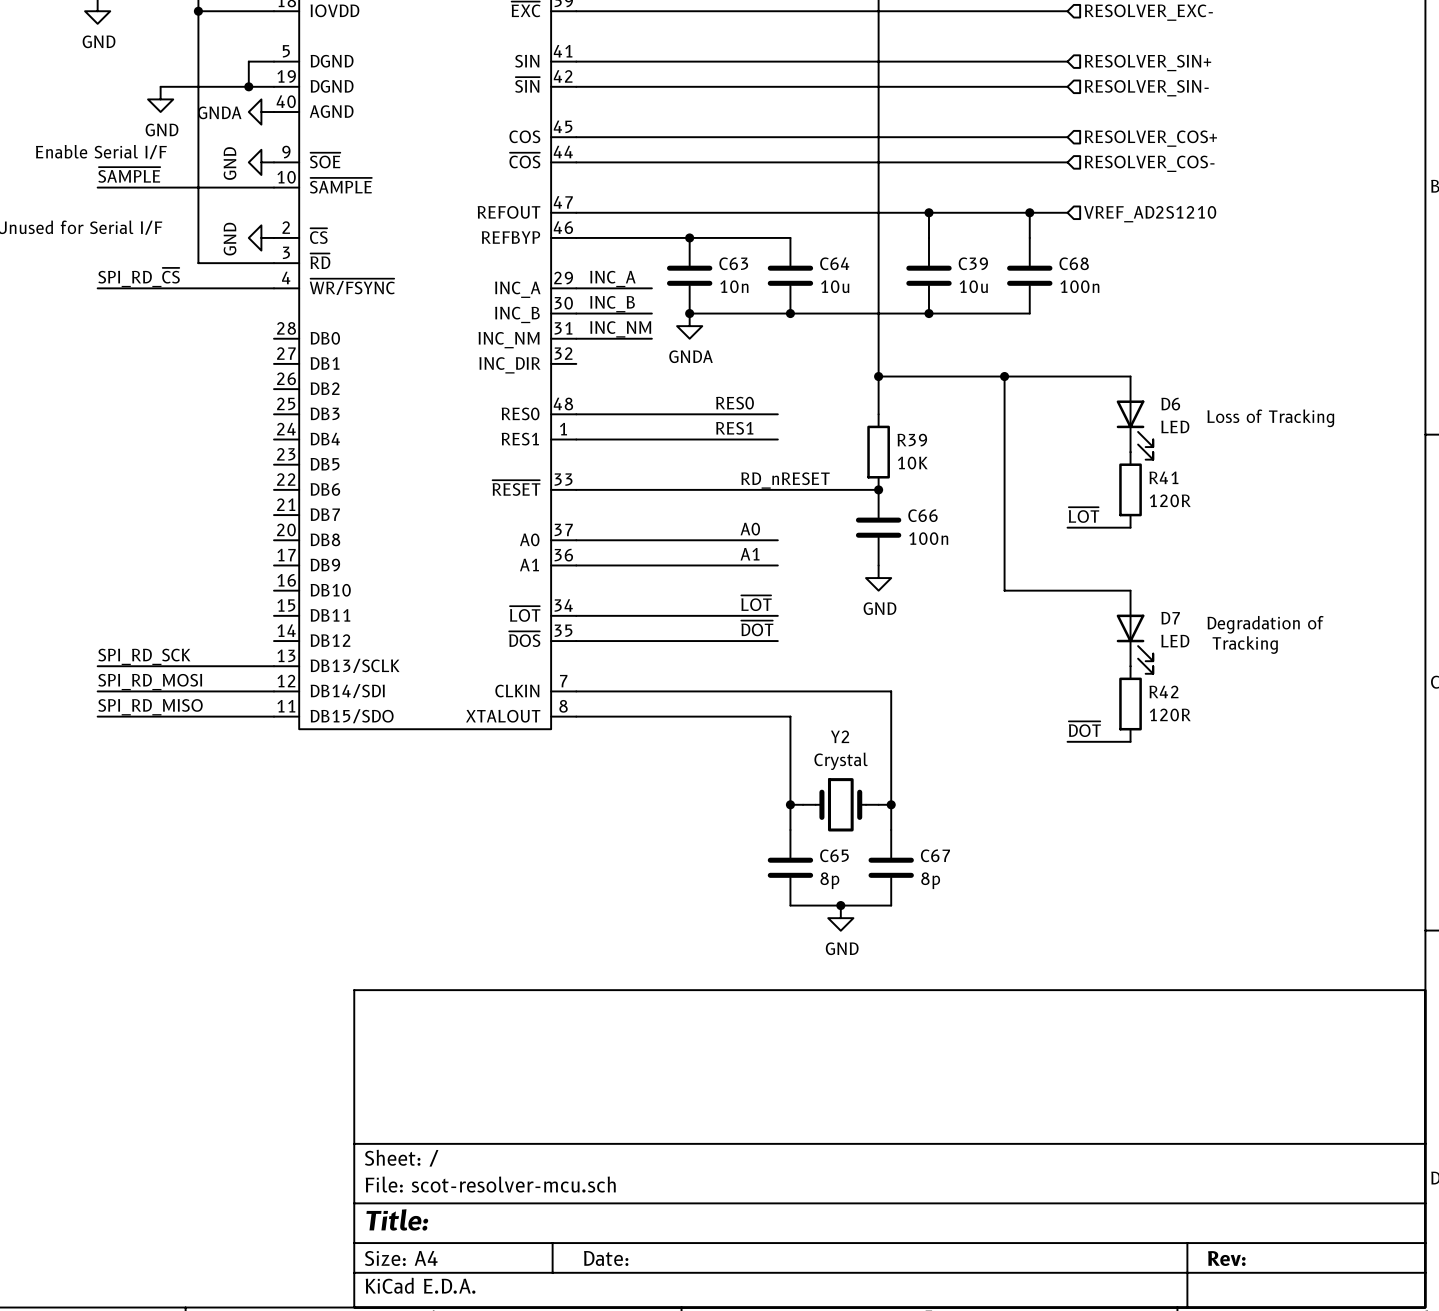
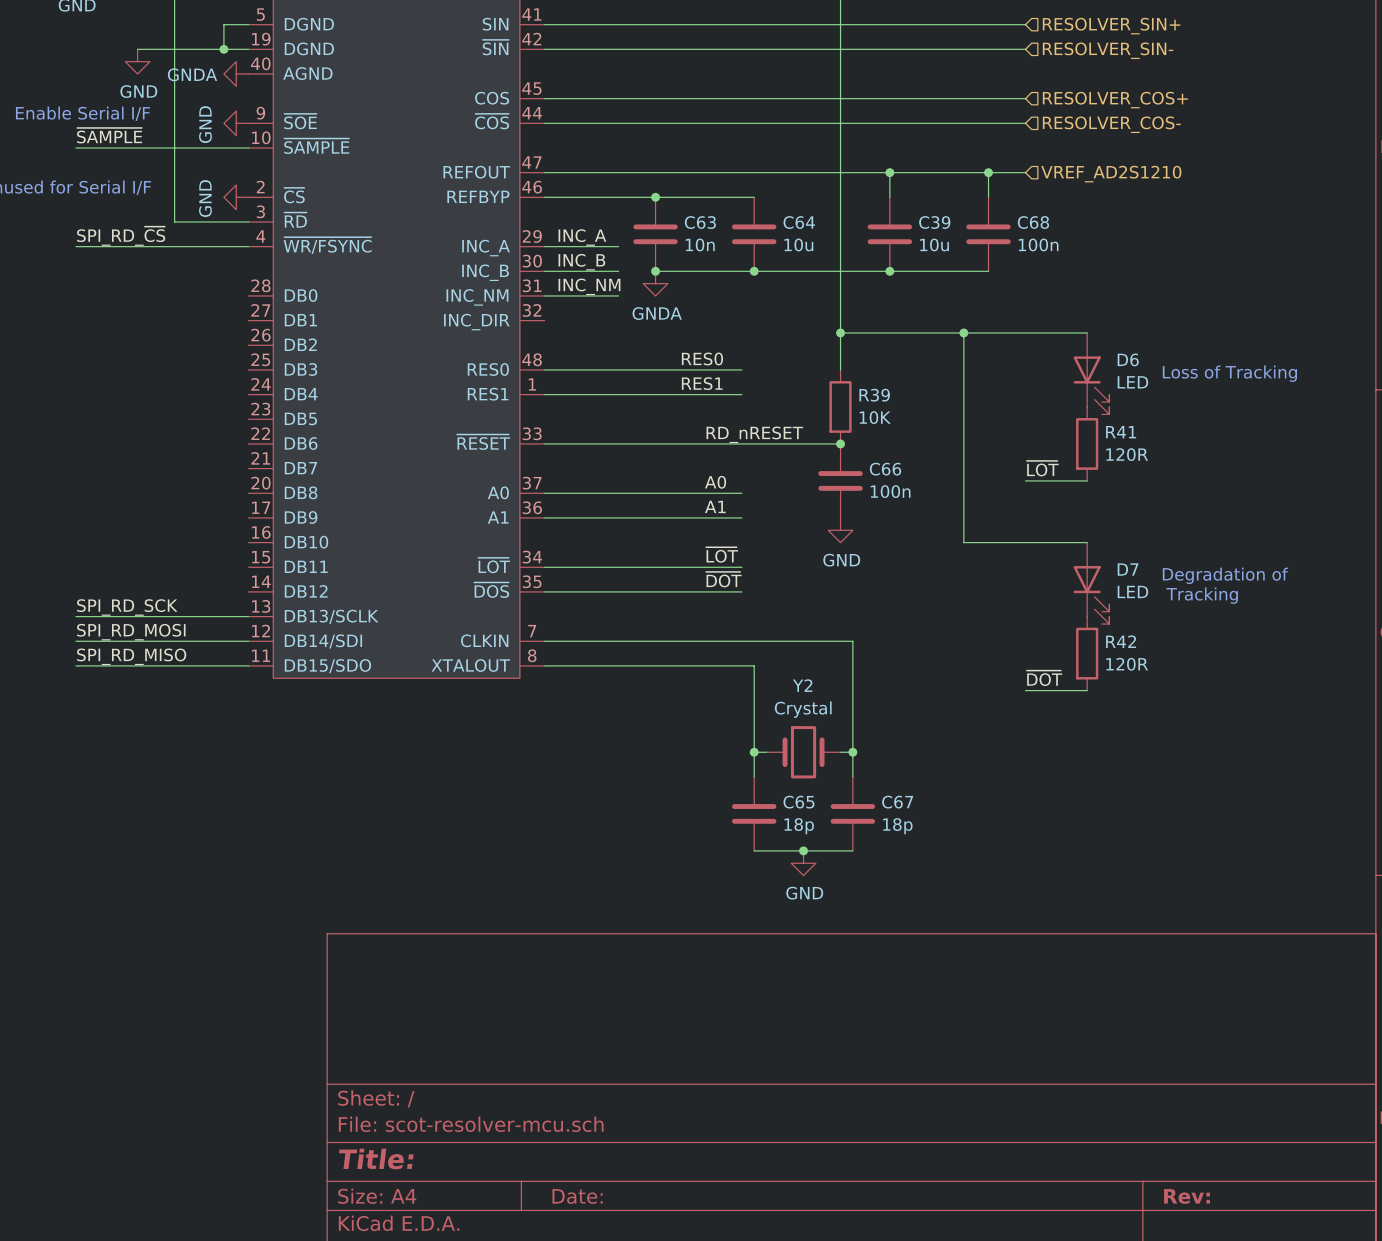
C65 value: 8p (829, 880) -> 18p (799, 826)
C67 value: 8p (930, 880) -> 18p (897, 826)

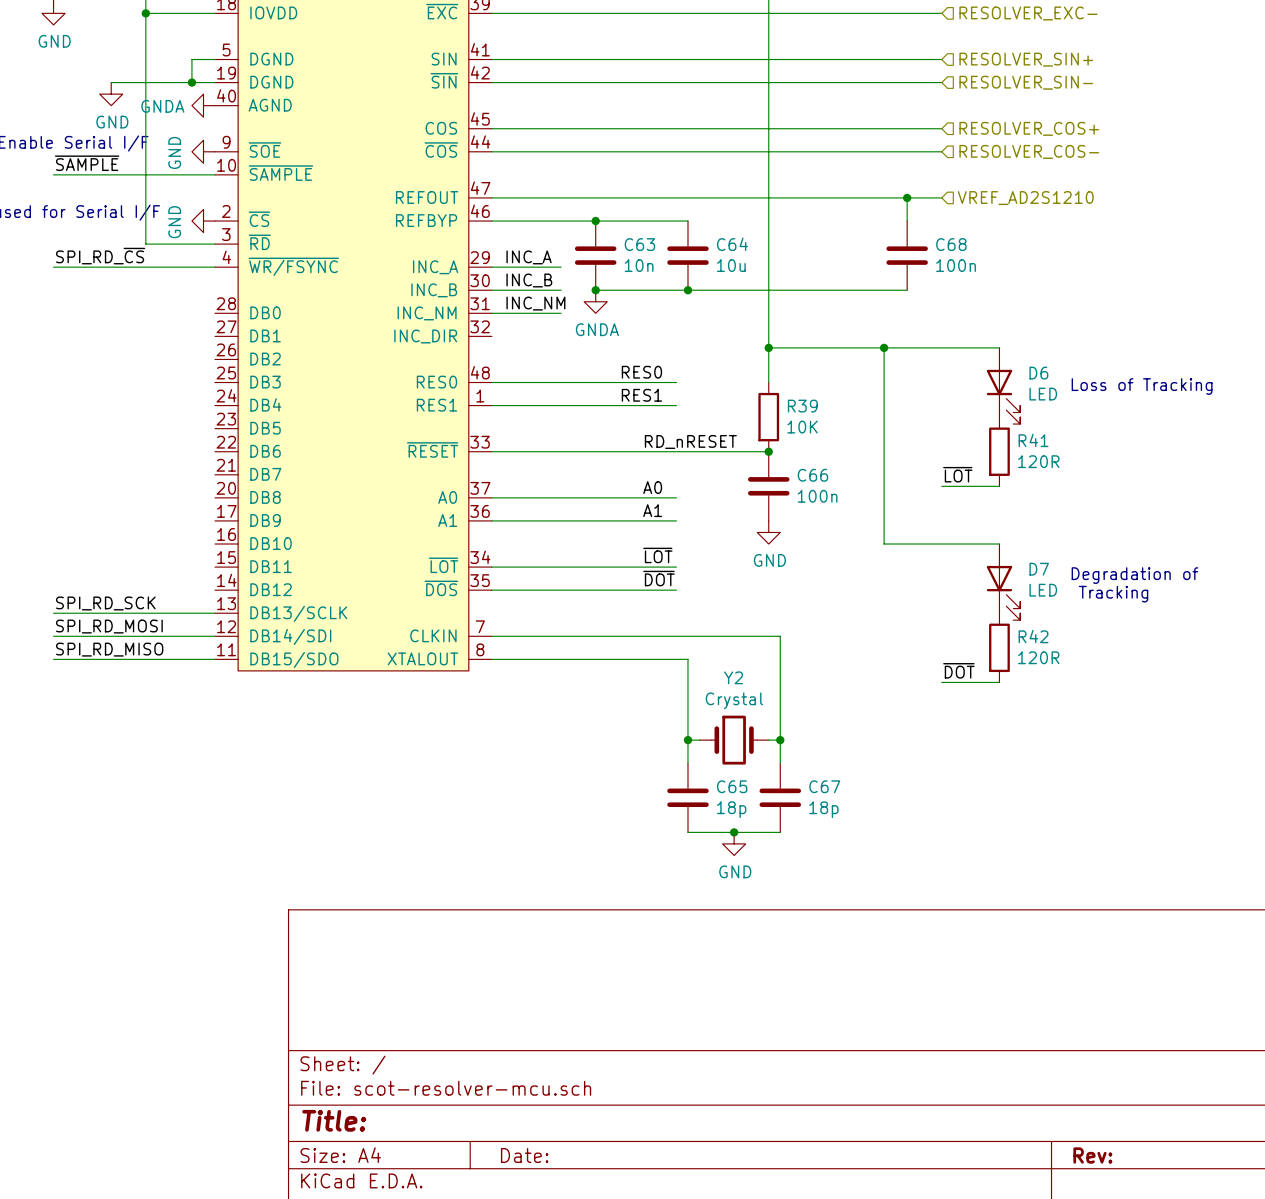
wire: (889, 172) (889, 197) -> none
junction: (889, 172) -> none
C39: 10u (889, 234) -> none
junction: (889, 271) -> none

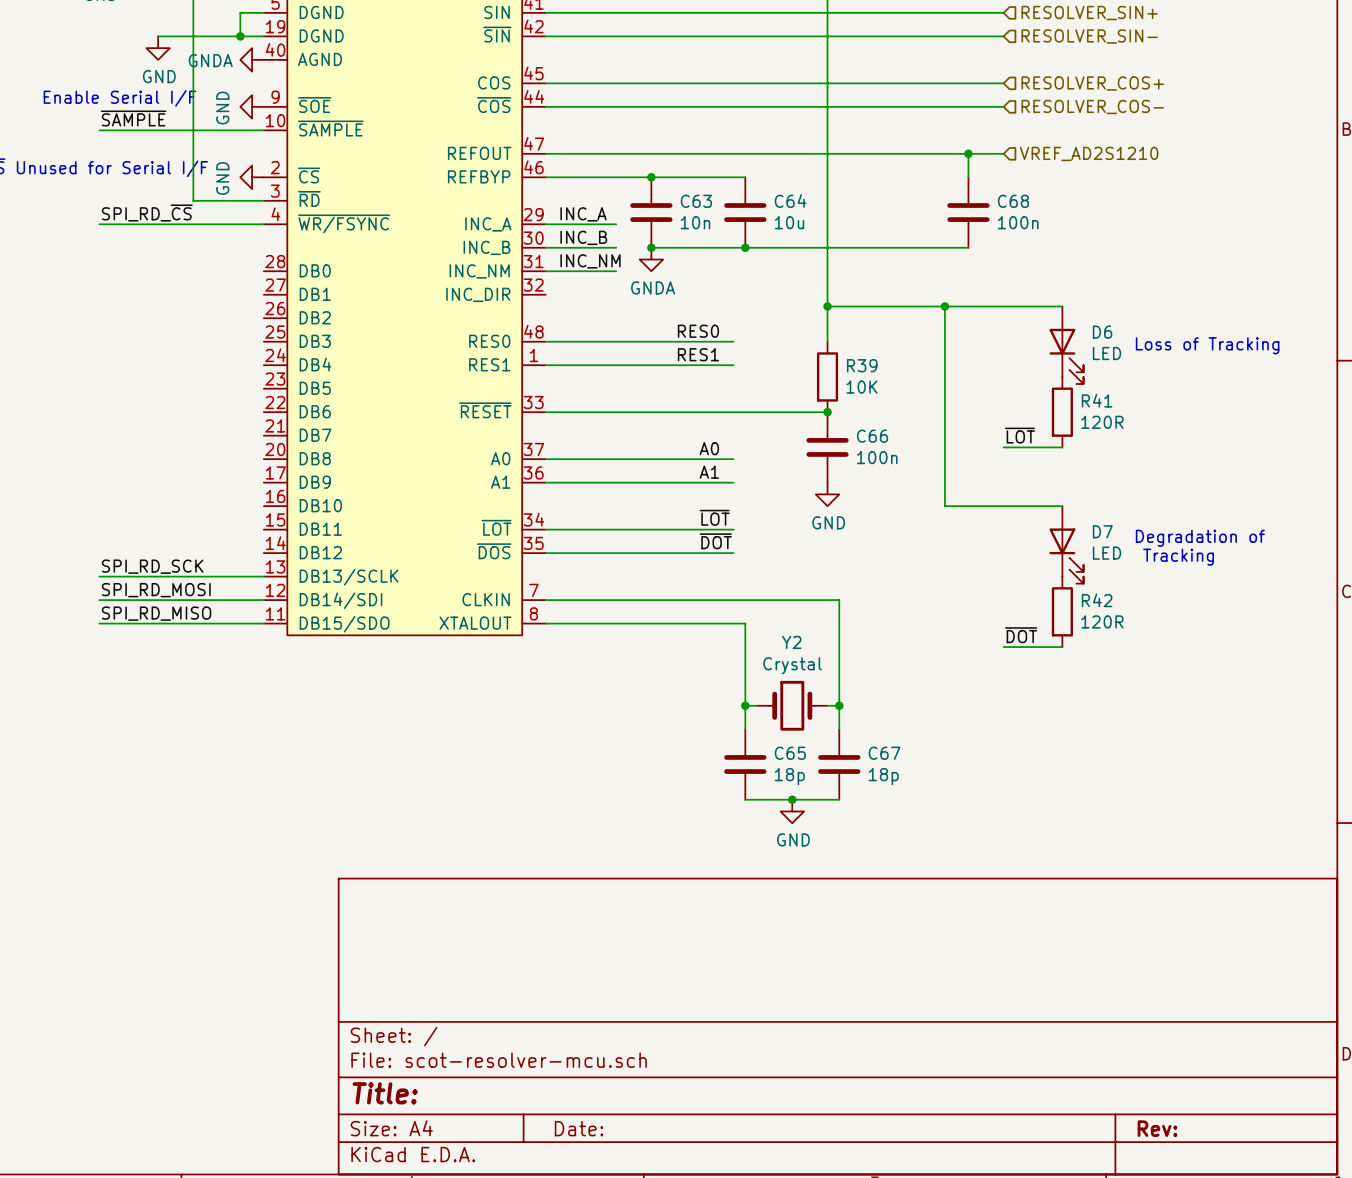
label: RD_nRESET (690, 441) -> none

